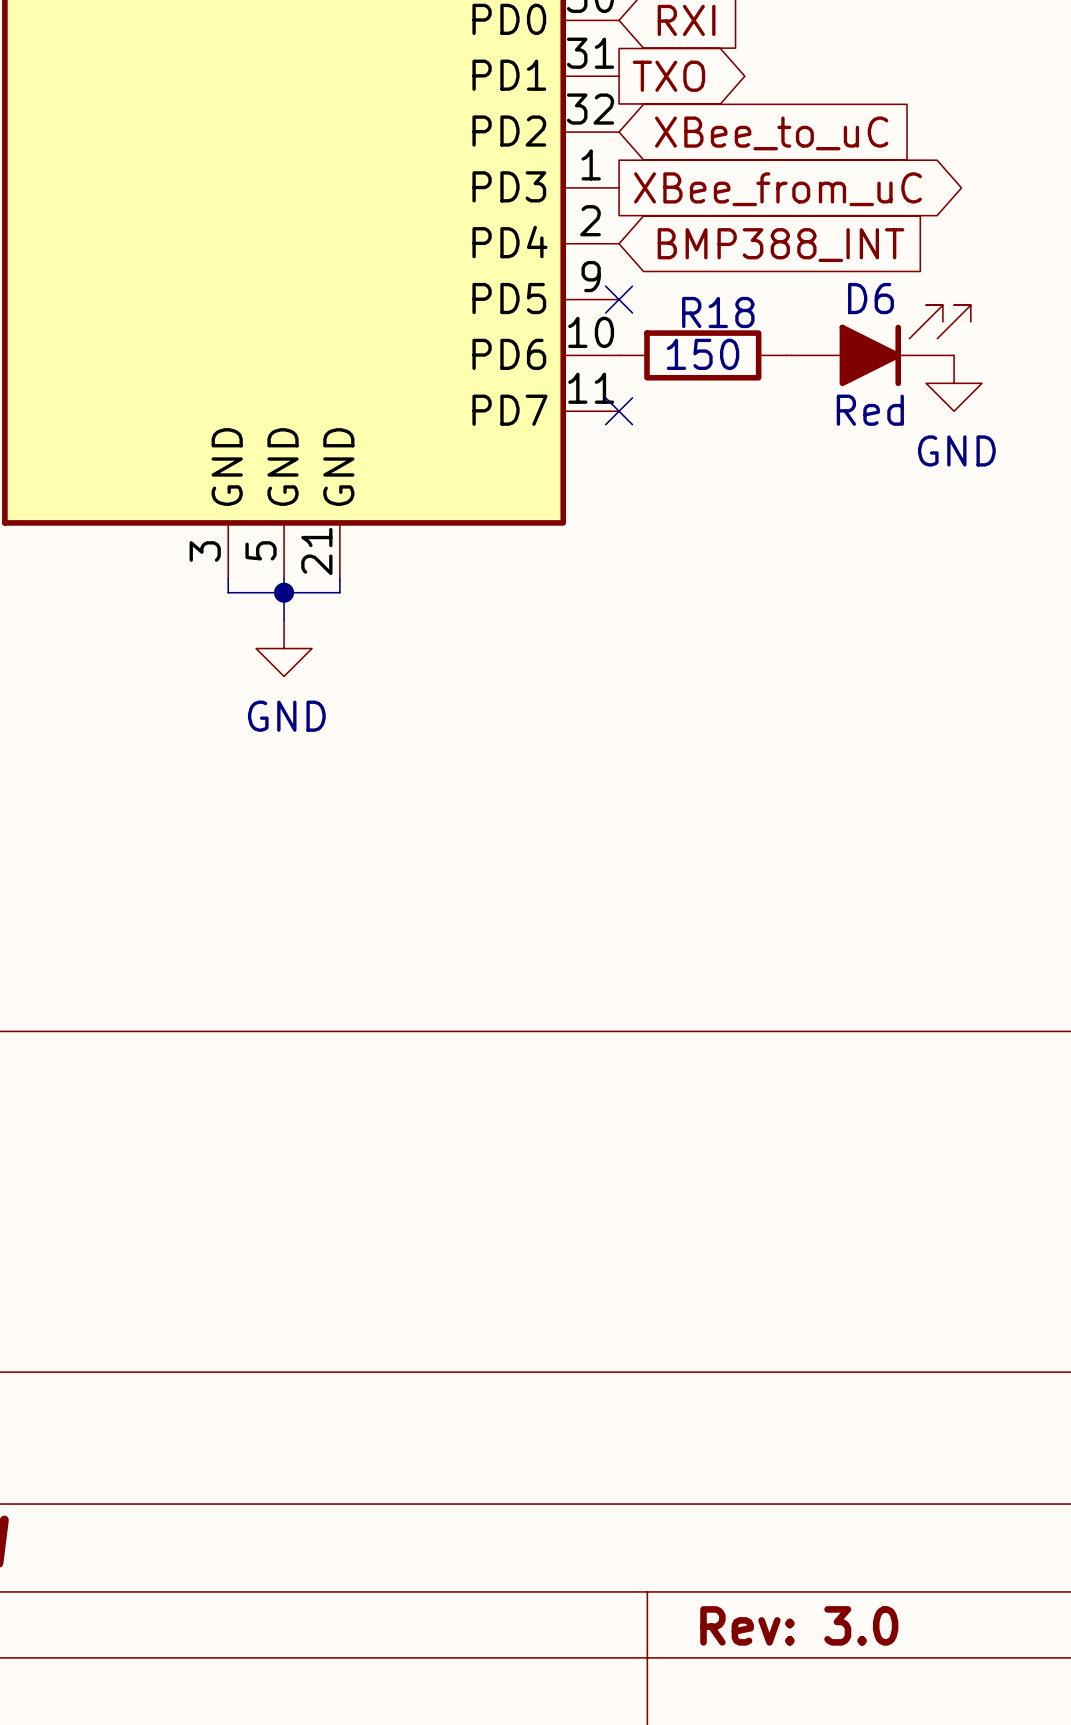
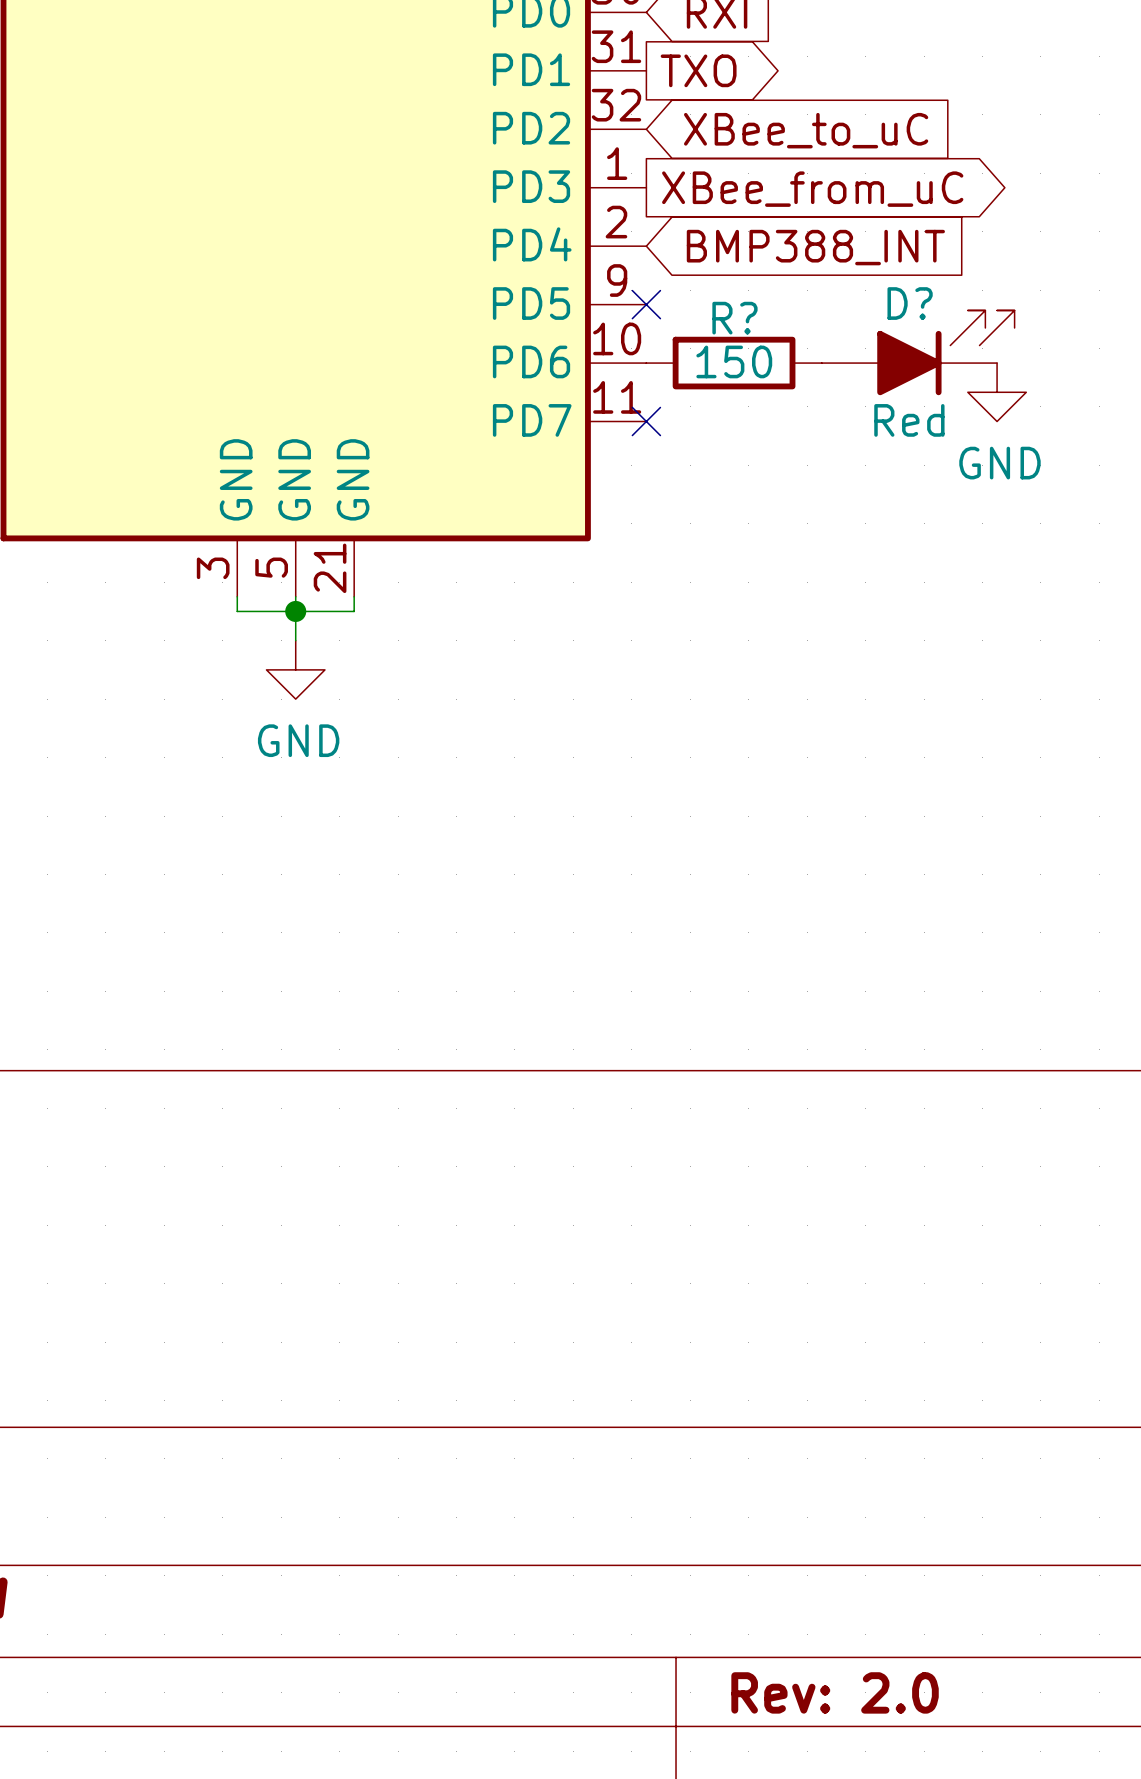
D6 name: D6 (870, 298) -> D? (910, 303)
R18 name: R18 (718, 312) -> R? (734, 318)
title block: Rev: 3.0 (799, 1625) -> Rev: 2.0 (835, 1692)

